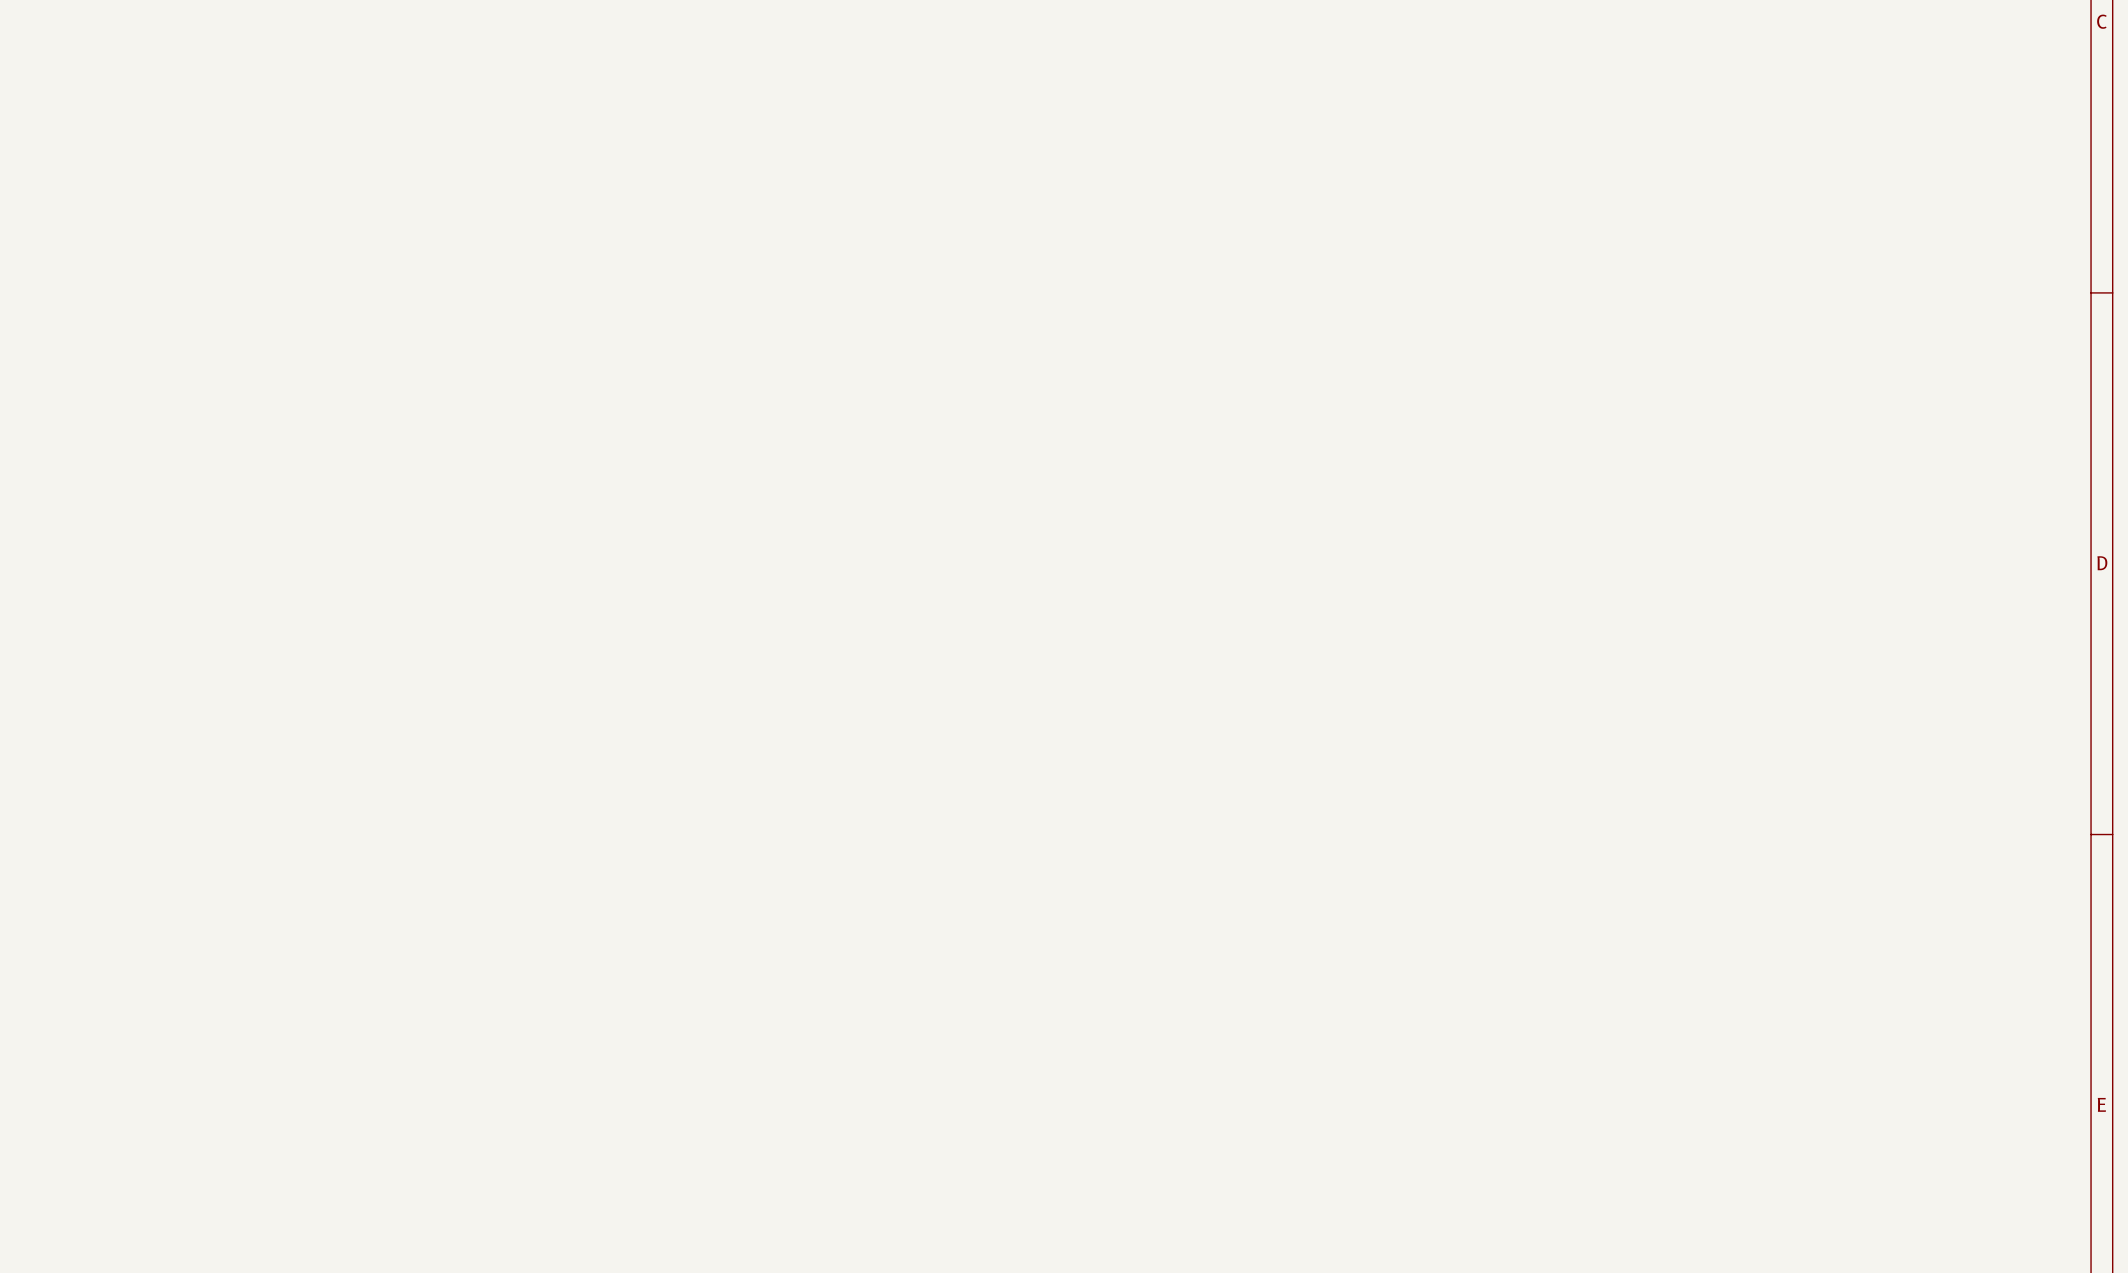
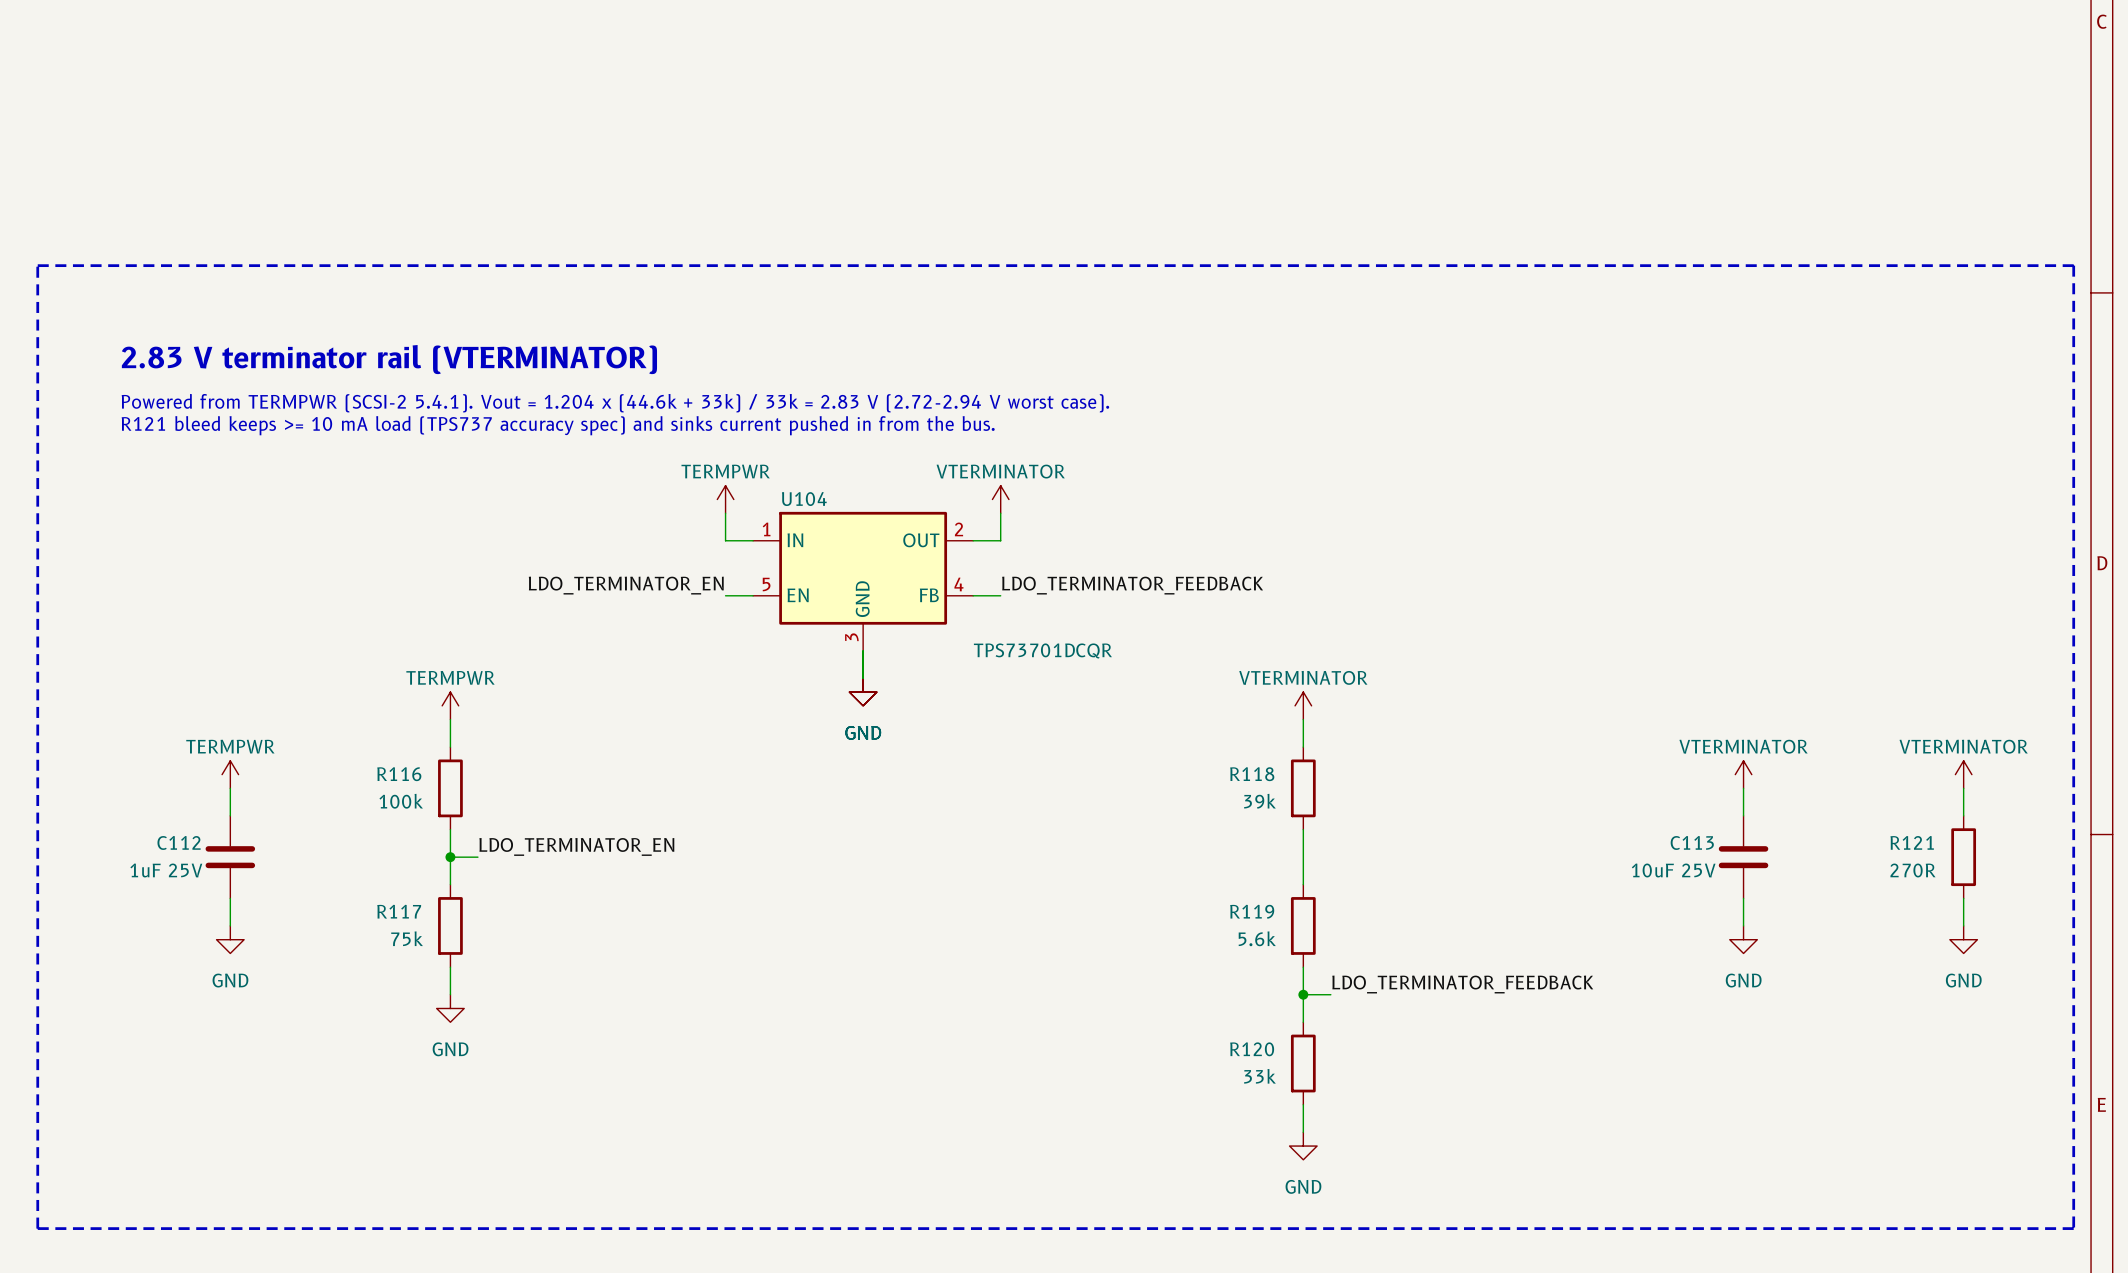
line: none -> (37, 265) (2073, 265) (2073, 1228) (37, 1228) (37, 265)
text: none -> 2.83 V terminator rail (VTERMINATOR) (389, 359)
text: none -> Powered from TERMPWR (SCSI-2 5.4.1). Vout = 1.204 x (44.6k + 33k) / 33k = 2.83 V (2.72-2.94 V worst case). (615, 403)
text: none -> R121 bleed keeps >= 10 mA load (TPS737 accuracy spec) and sinks current pushed in from the bus. (558, 425)
power symbol: none -> TERMPWR (725, 499)
power symbol: none -> VTERMINATOR (1000, 499)
wire: none -> (725, 513) (725, 540) (753, 540)
wire: none -> (1000, 513) (1000, 540) (973, 540)
U104: none -> TPS73701DCQR (863, 581)
label: none -> LDO_TERMINATOR_EN (626, 585)
label: none -> LDO_TERMINATOR_FEEDBACK (1132, 585)
wire: none -> (725, 595) (753, 595)
wire: none -> (973, 595) (1000, 595)
wire: none -> (863, 650) (863, 678)
power symbol: none -> GND (863, 692)
power symbol: none -> TERMPWR (450, 705)
power symbol: none -> VTERMINATOR (1303, 705)
wire: none -> (450, 719) (450, 747)
wire: none -> (1303, 719) (1303, 747)
power symbol: none -> TERMPWR (230, 774)
power symbol: none -> VTERMINATOR (1743, 774)
power symbol: none -> VTERMINATOR (1963, 774)
wire: none -> (230, 788) (230, 815)
R116: none -> 100k (450, 788)
R118: none -> 39k (1303, 788)
wire: none -> (1743, 788) (1743, 815)
wire: none -> (1963, 788) (1963, 815)
wire: none -> (450, 829) (450, 884)
wire: none -> (1303, 829) (1303, 884)
label: none -> LDO_TERMINATOR_EN (576, 846)
C112: none -> 1uF 25V (230, 857)
wire: none -> (450, 857) (477, 857)
junction: none -> (450, 857)
C113: none -> 10uF 25V (1743, 857)
R121: none -> 270R (1963, 857)
wire: none -> (230, 898) (230, 925)
wire: none -> (1743, 898) (1743, 925)
wire: none -> (1963, 898) (1963, 925)
R117: none -> 75k (450, 925)
R119: none -> 5.6k (1303, 925)
power symbol: none -> GND (230, 939)
power symbol: none -> GND (1743, 939)
power symbol: none -> GND (1963, 939)
wire: none -> (450, 967) (450, 994)
wire: none -> (1303, 967) (1303, 1022)
label: none -> LDO_TERMINATOR_FEEDBACK (1462, 984)
wire: none -> (1303, 994) (1330, 994)
junction: none -> (1303, 994)
power symbol: none -> GND (450, 1008)
R120: none -> 33k (1303, 1063)
wire: none -> (1303, 1104) (1303, 1132)
power symbol: none -> GND (1303, 1146)

